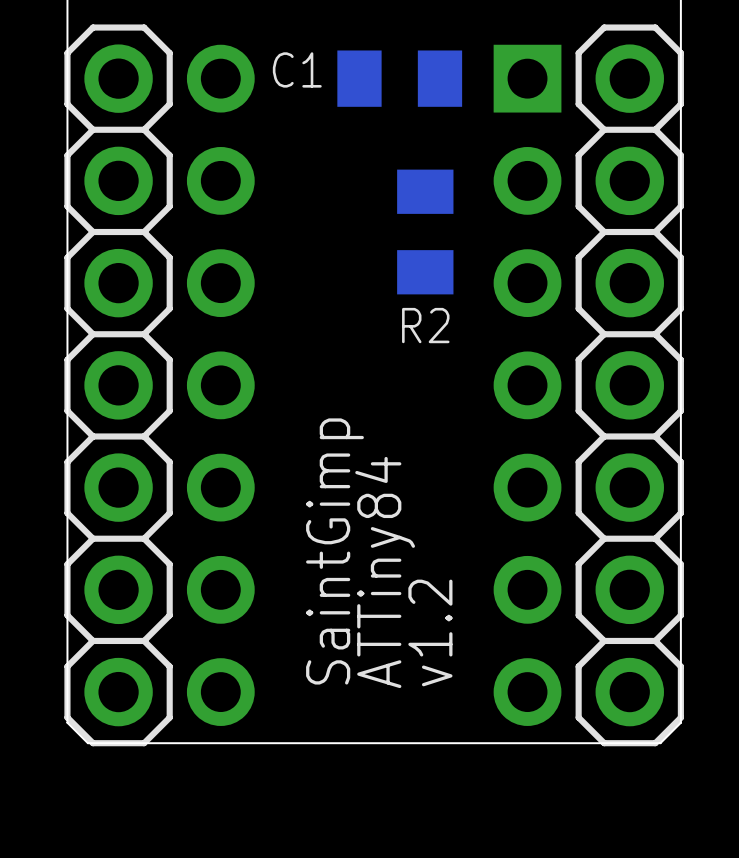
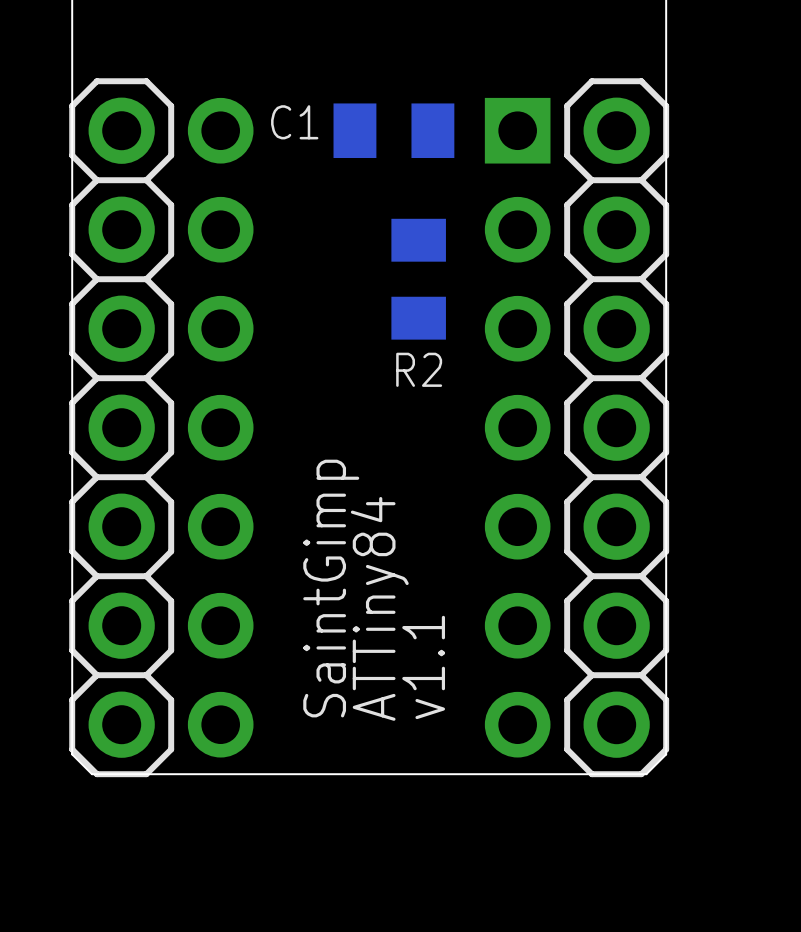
text: v1.2 (430, 632) -> v1.1 (423, 667)

